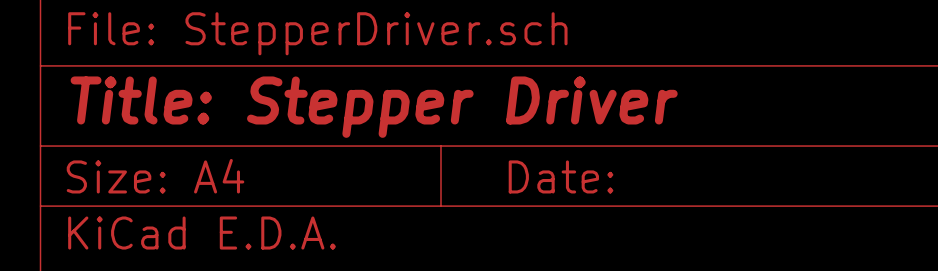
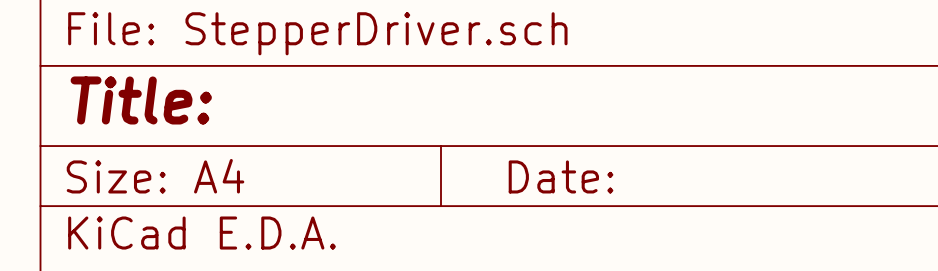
title block: Title: Stepper Driver (374, 107) -> Title: (141, 100)

